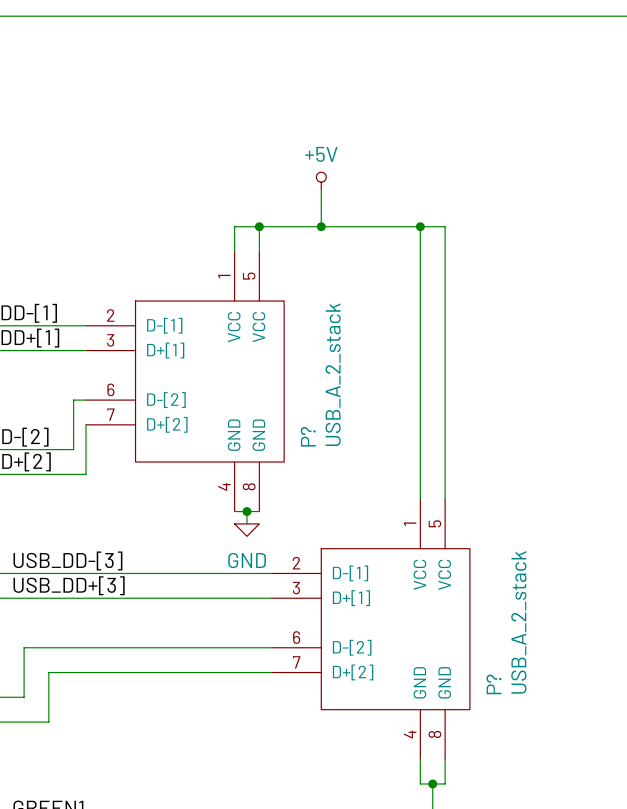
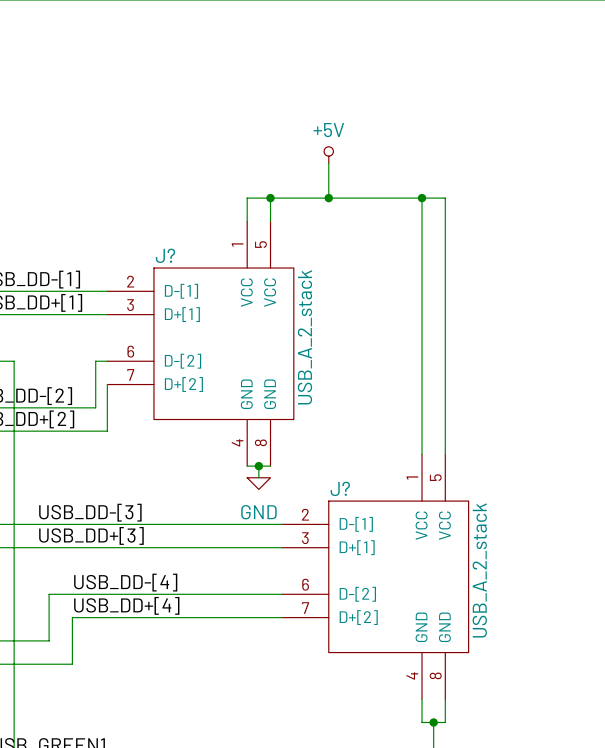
P? value position: USB_A_2_stack (333, 374) -> USB_A_2_stack (304, 337)
P? name: P? (308, 436) -> J? (165, 255)
P? value position: USB_A_2_stack (518, 622) -> USB_A_2_stack (479, 570)
label: none -> USB_DD-[4] (125, 582)
label: none -> USB_DD+[4] (126, 605)
P? name: P? (494, 684) -> J? (340, 488)

